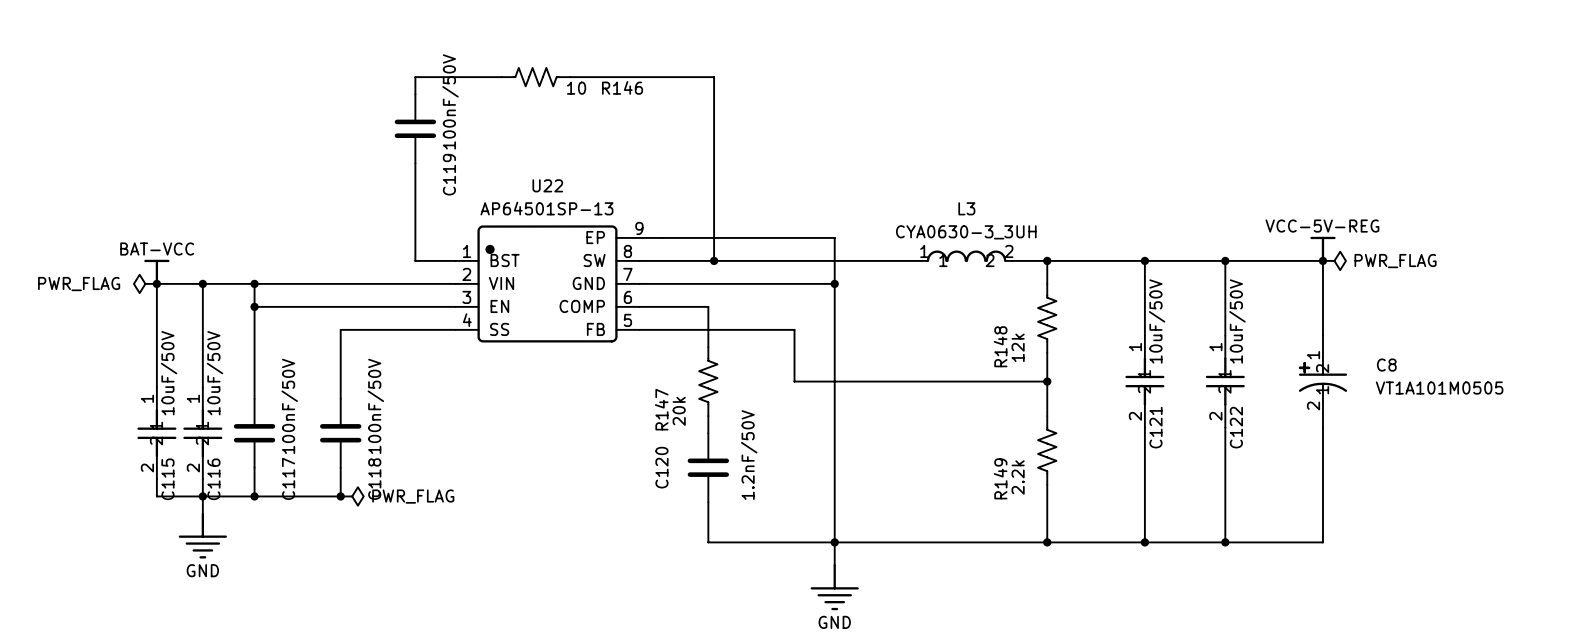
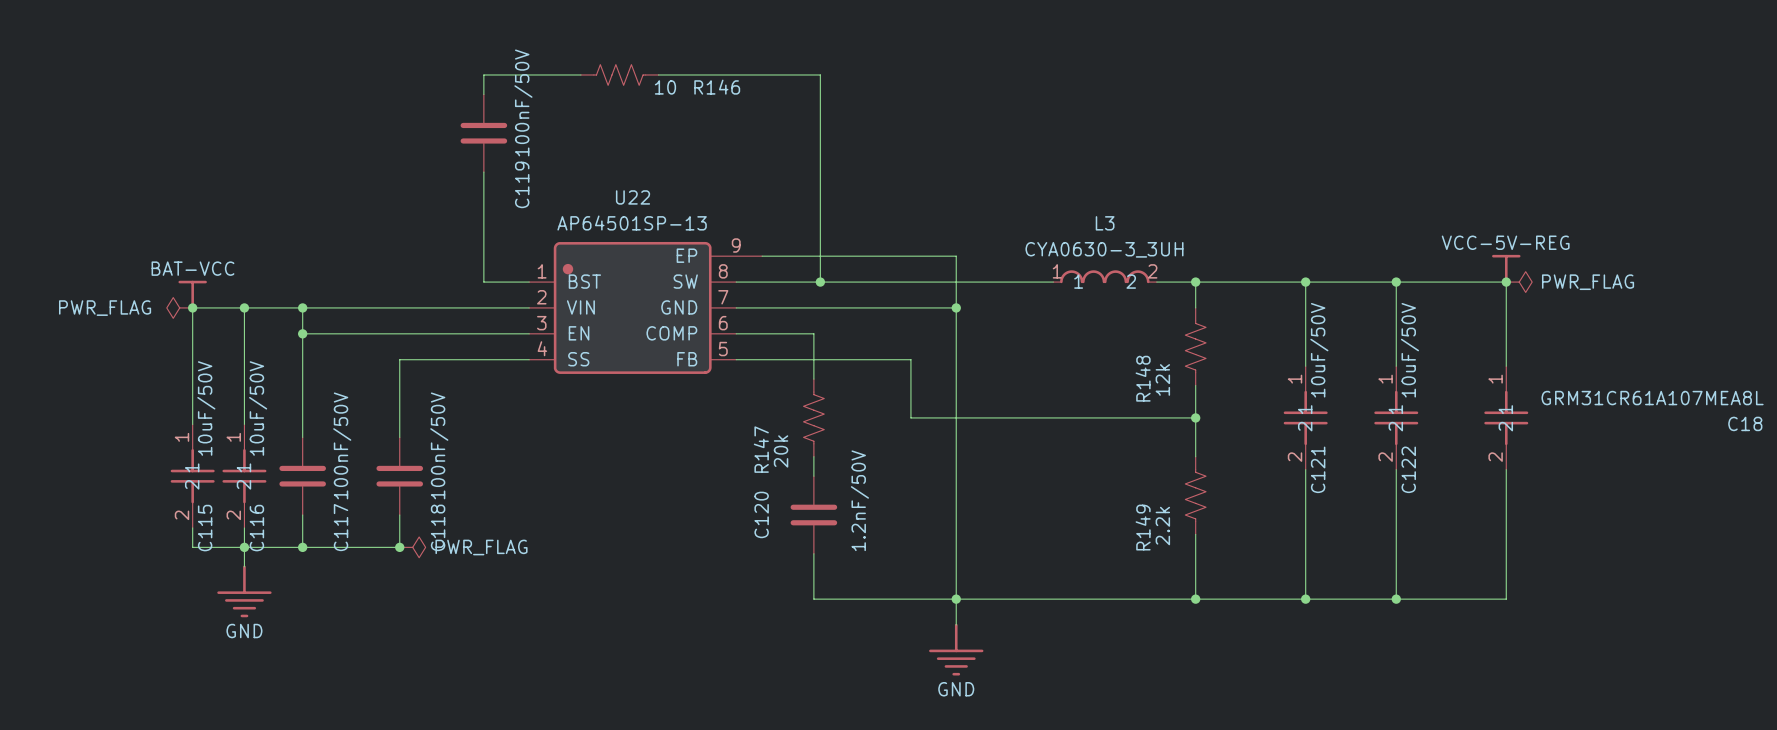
C8: VT1A101M0505 (1322, 381) -> none
C18: none -> GRM31CR61A107MEA8L (1506, 417)

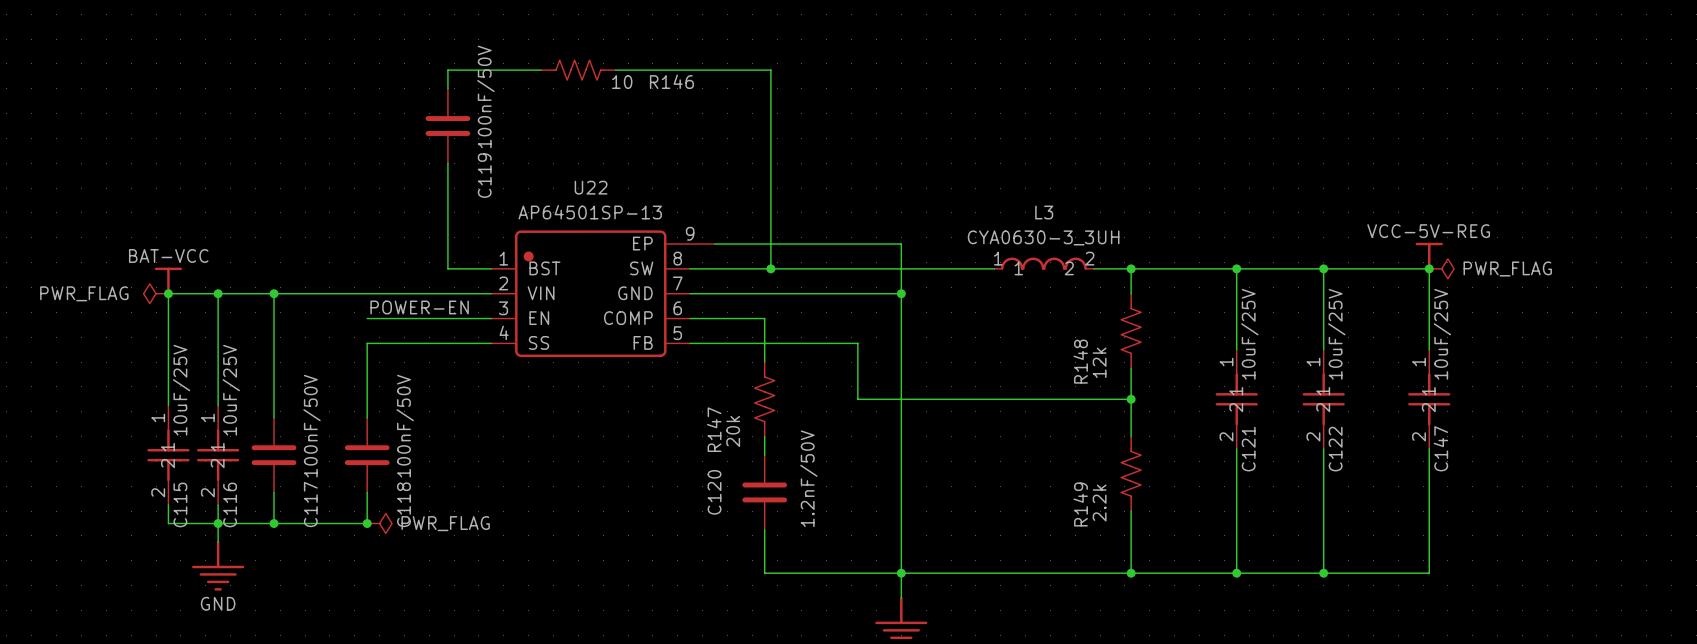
label: none -> POWER-EN (419, 307)
wire: (302, 333) (399, 333) -> none
junction: (302, 333) -> none
C121 value: 10uF/50V (1319, 350) -> 10uF/25V (1249, 334)
C122 value: 10uF/50V (1409, 350) -> 10uF/25V (1336, 334)
C18 value: GRM31CR61A107MEA8L (1652, 398) -> 10uF/25V (1442, 334)
C115 value: 10uF/50V (206, 408) -> 10uF/25V (181, 390)
C116 value: 10uF/50V (258, 408) -> 10uF/25V (231, 390)
C18 name: C18 (1745, 423) -> C147 (1440, 448)

